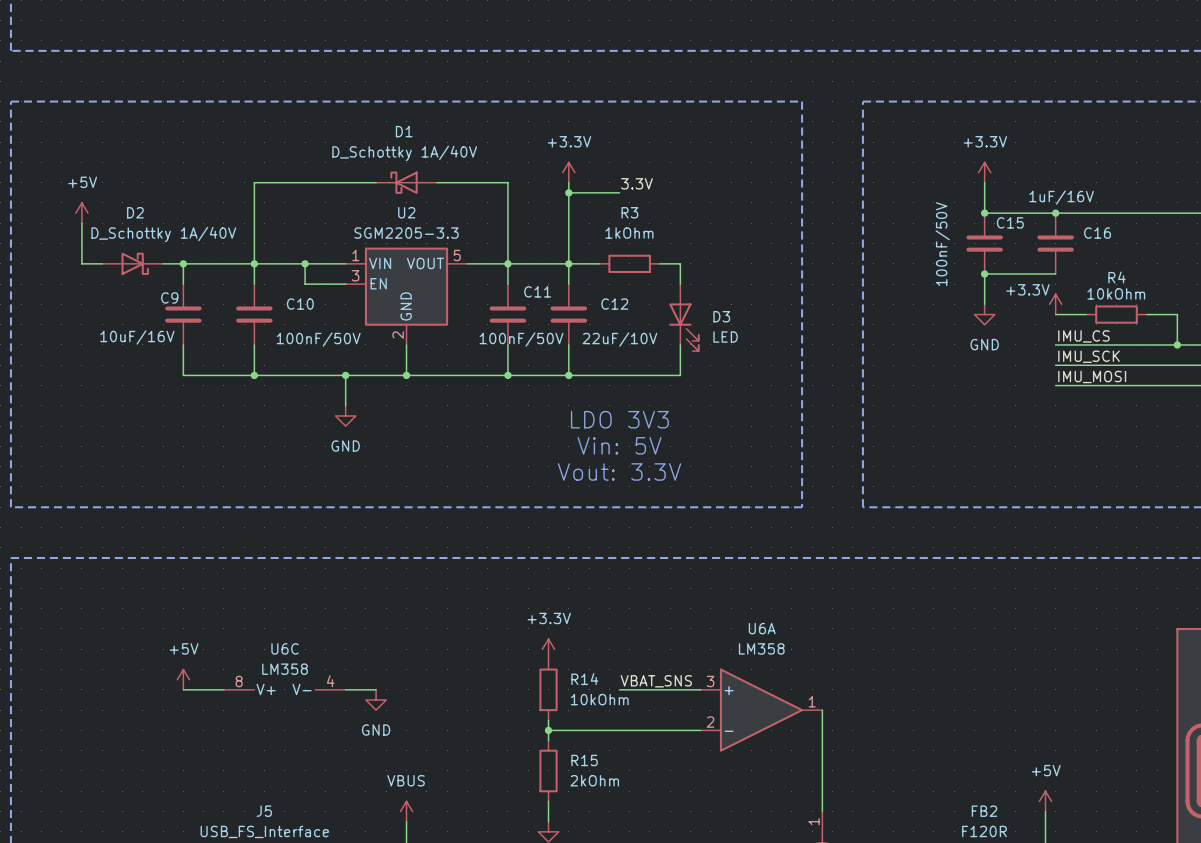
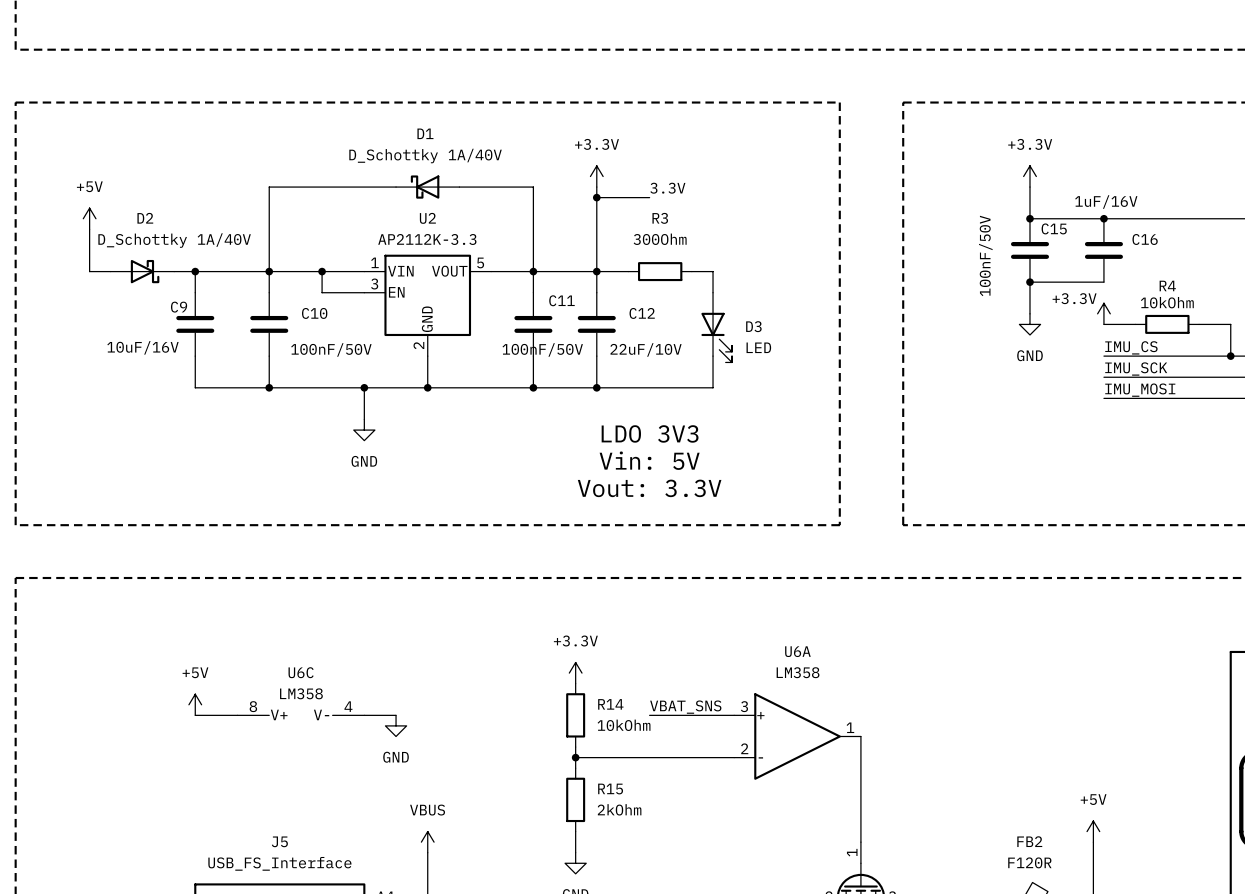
U2 value: SGM2205-3.3 (406, 233) -> AP2112K-3.3 (427, 239)
R3 value: 1kOhm (629, 233) -> 300Ohm (660, 239)

